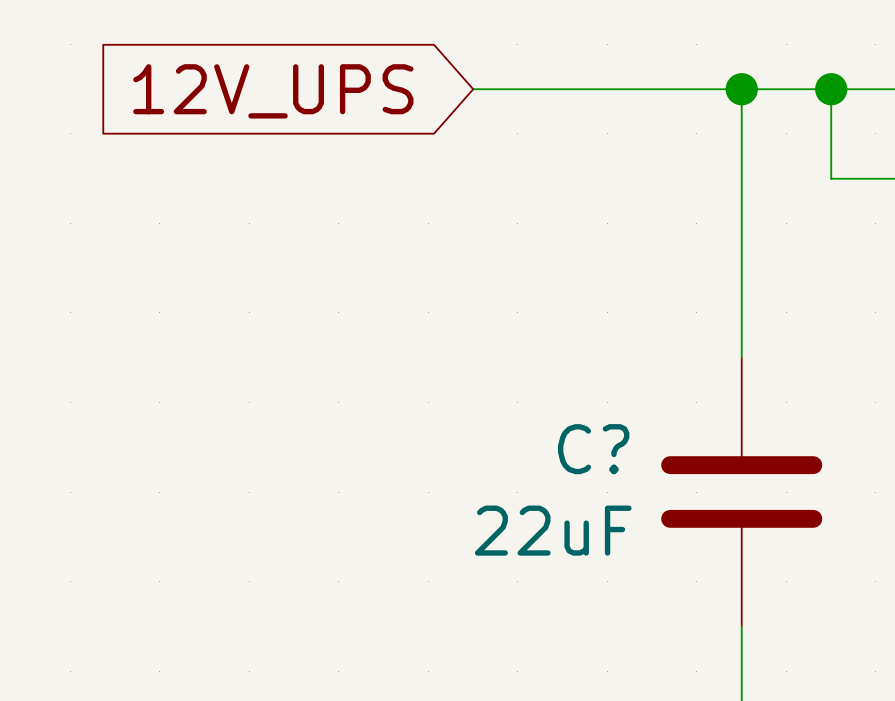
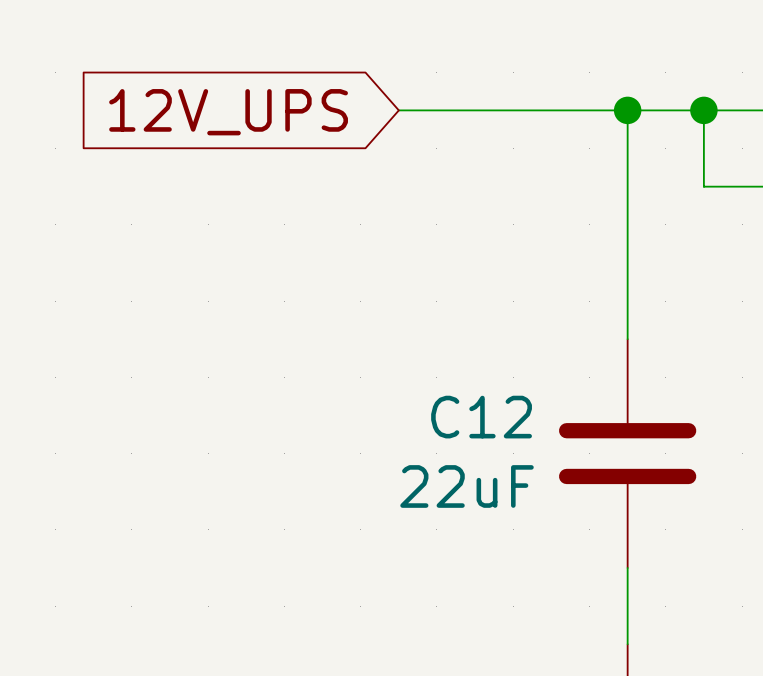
C? name: C? (593, 449) -> C12 (481, 417)

